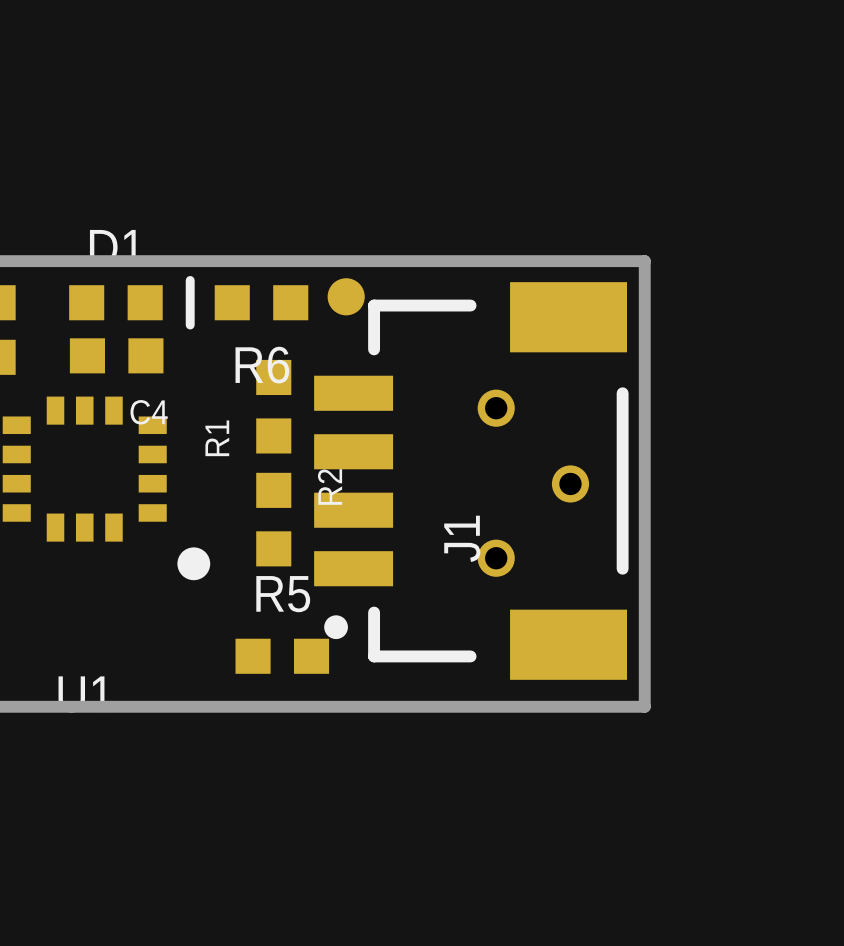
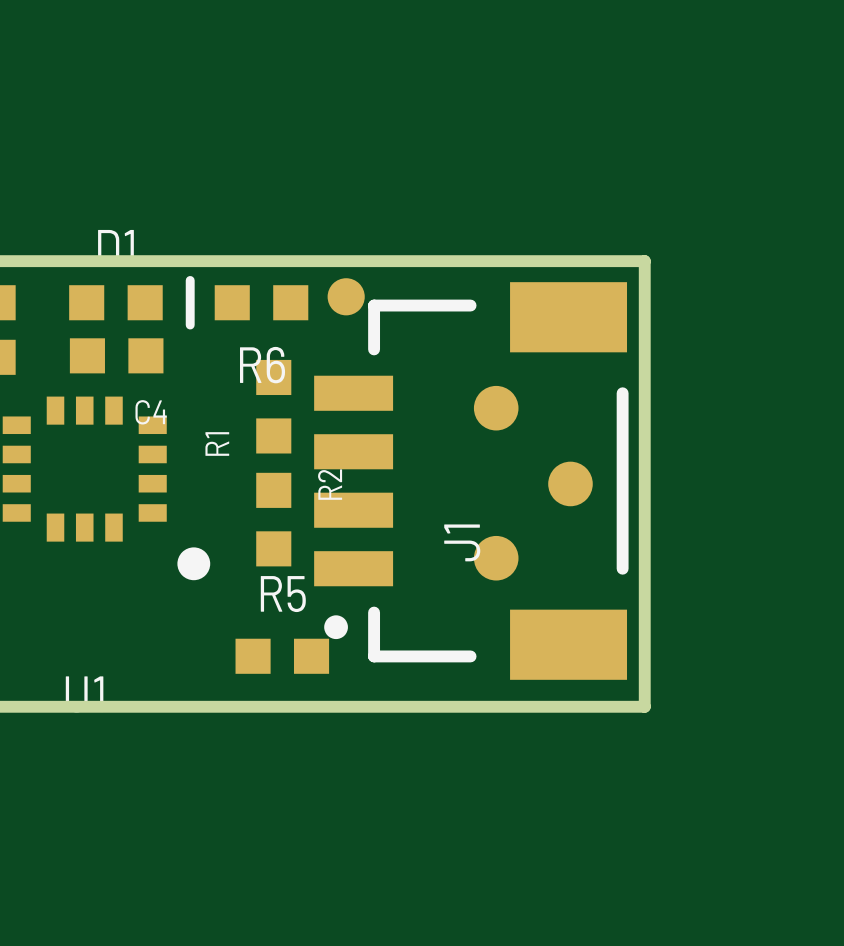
part footprint: [477, 389, 515, 427] -> [473, 385, 519, 431]
part footprint: [551, 465, 590, 503] -> [548, 461, 593, 507]
part footprint: [477, 539, 515, 577] -> [473, 535, 519, 581]

